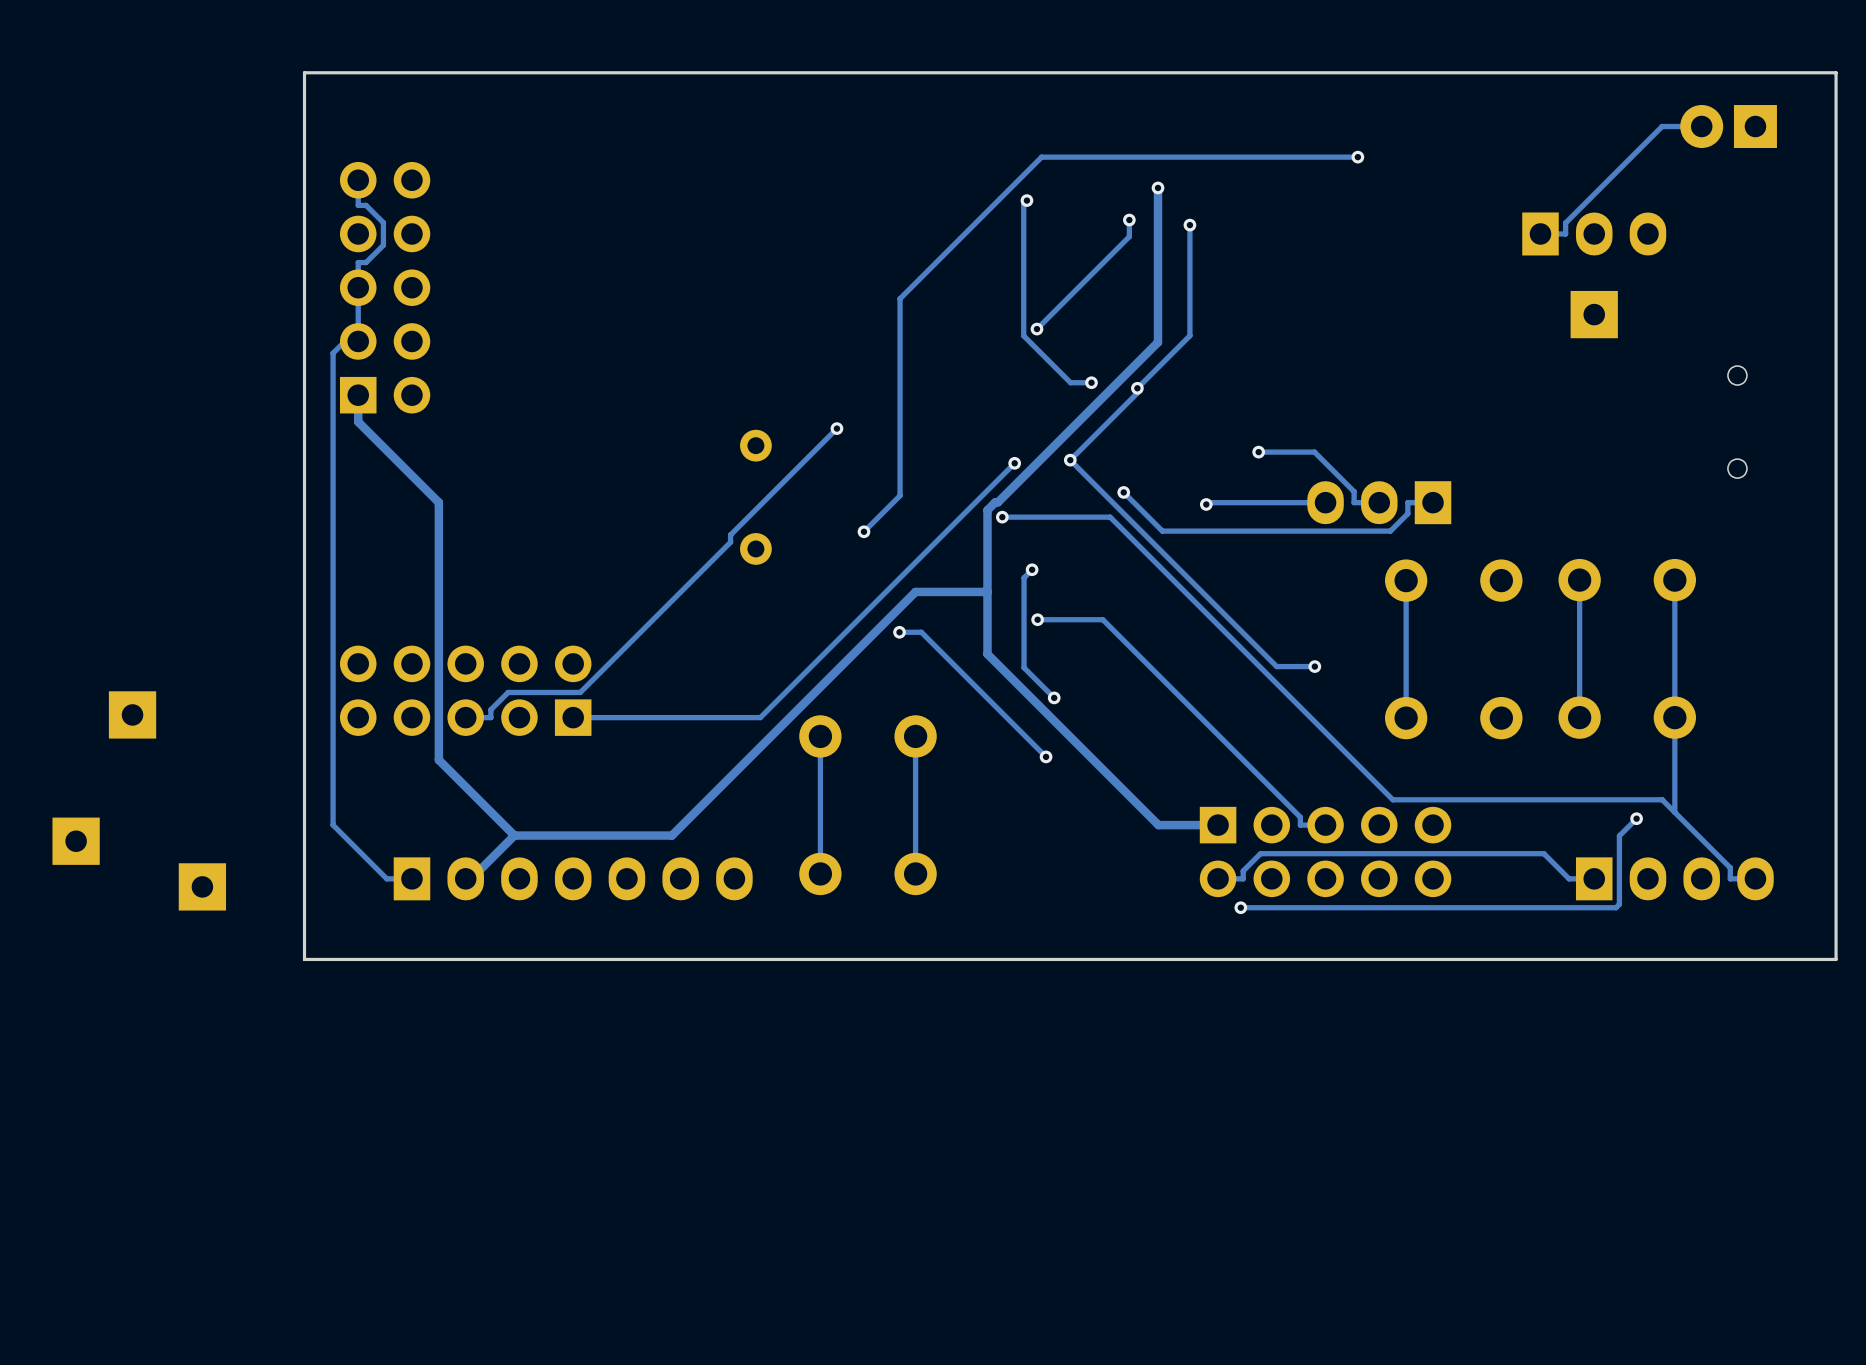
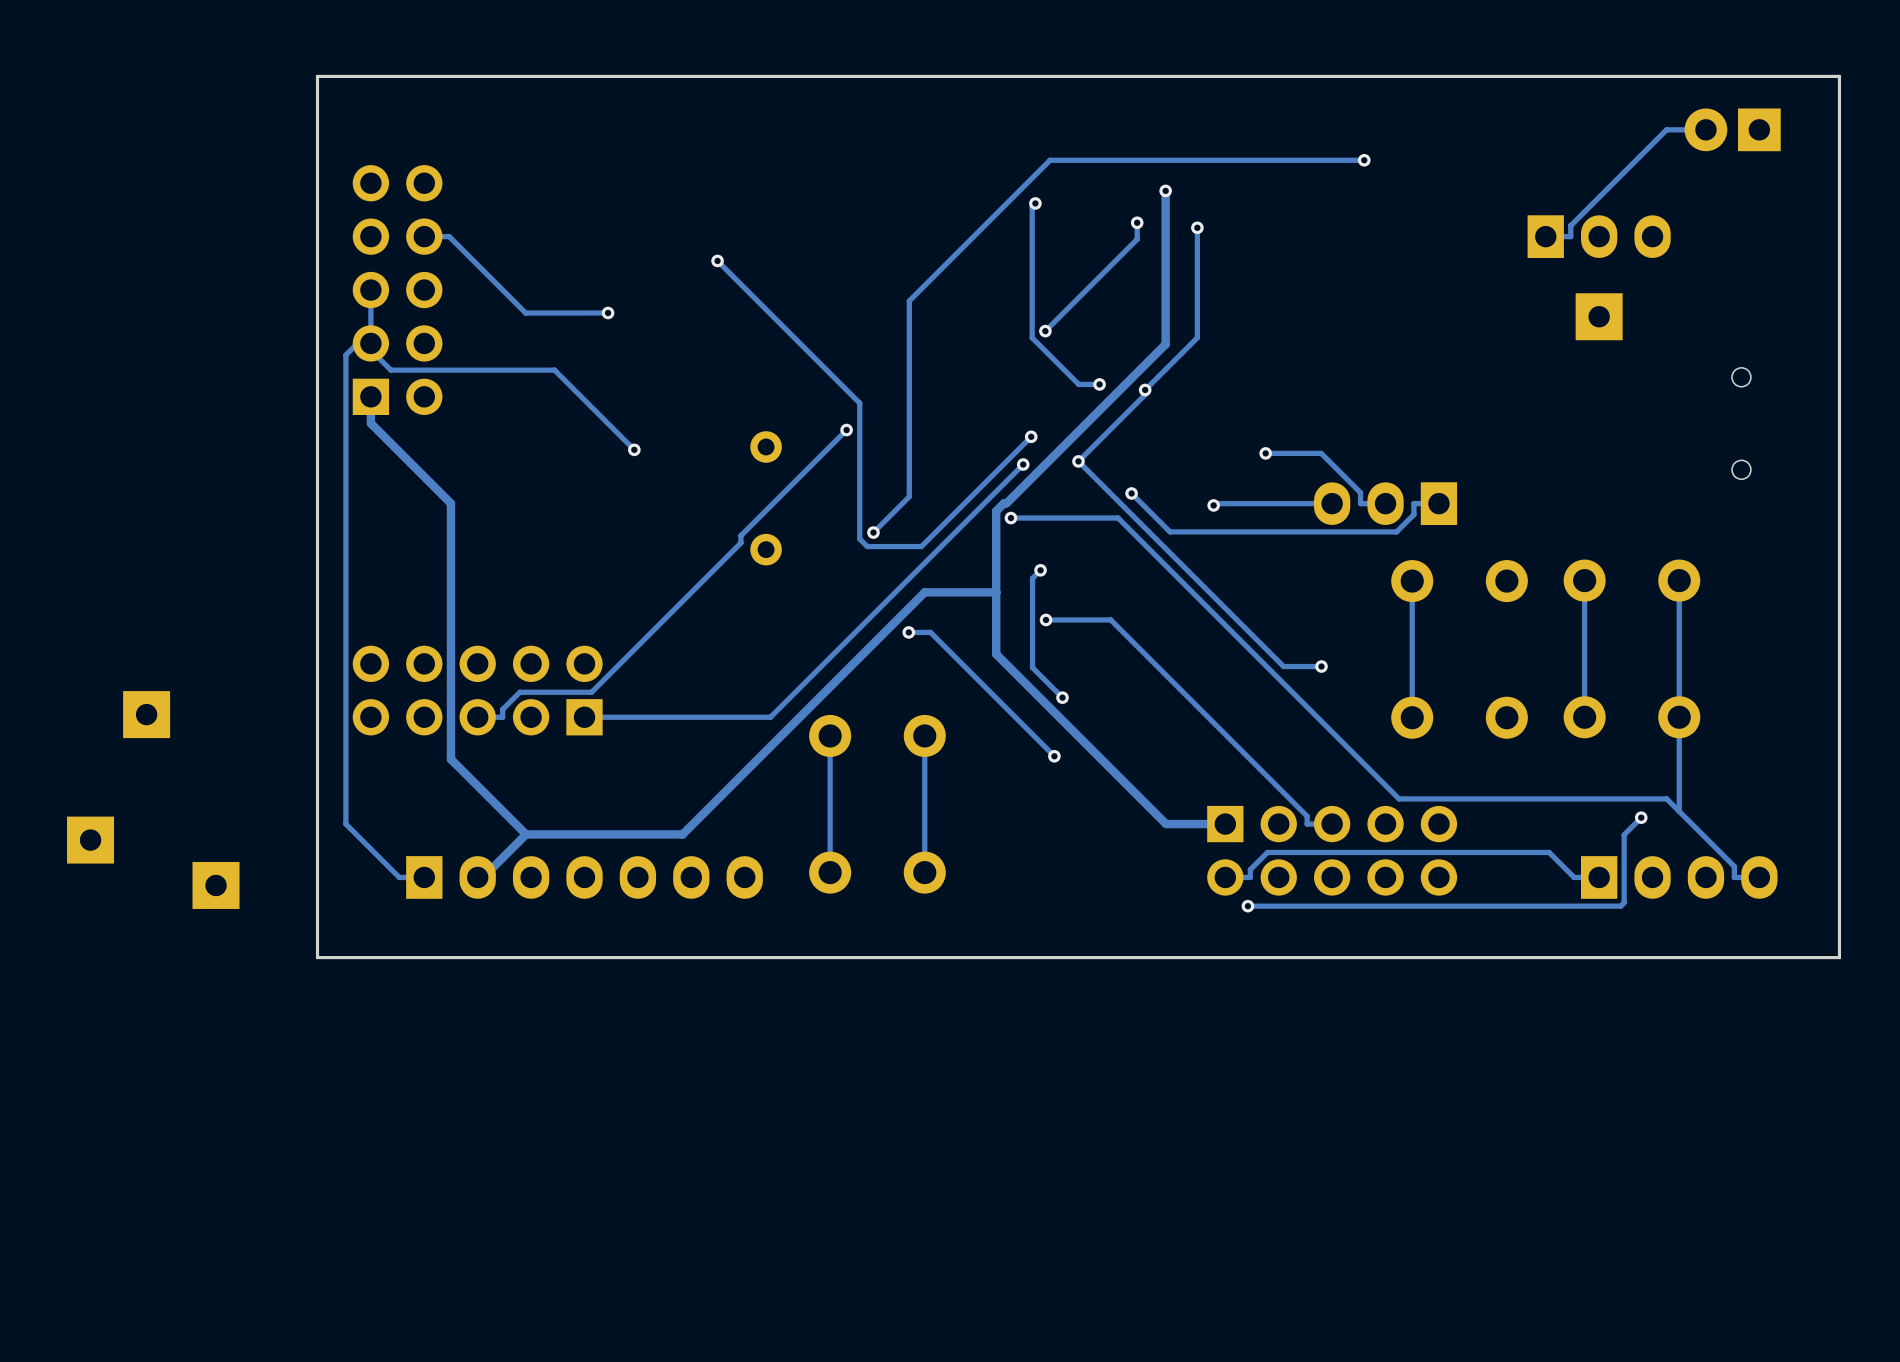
track: (358, 180) (358, 205) (366, 205) (383, 222) (383, 245) (366, 262) (358, 262) (358, 287) -> none
track: none -> (424, 236) (449, 236) (525, 312) (608, 312)
track: none -> (717, 260) (859, 403) (859, 538) (867, 546) (921, 546) (1031, 436)
via: none -> (717, 260)
via: none -> (608, 312)
track: none -> (364, 343) (390, 370) (554, 370) (634, 449)
via: none -> (1031, 436)
via: none -> (634, 449)

